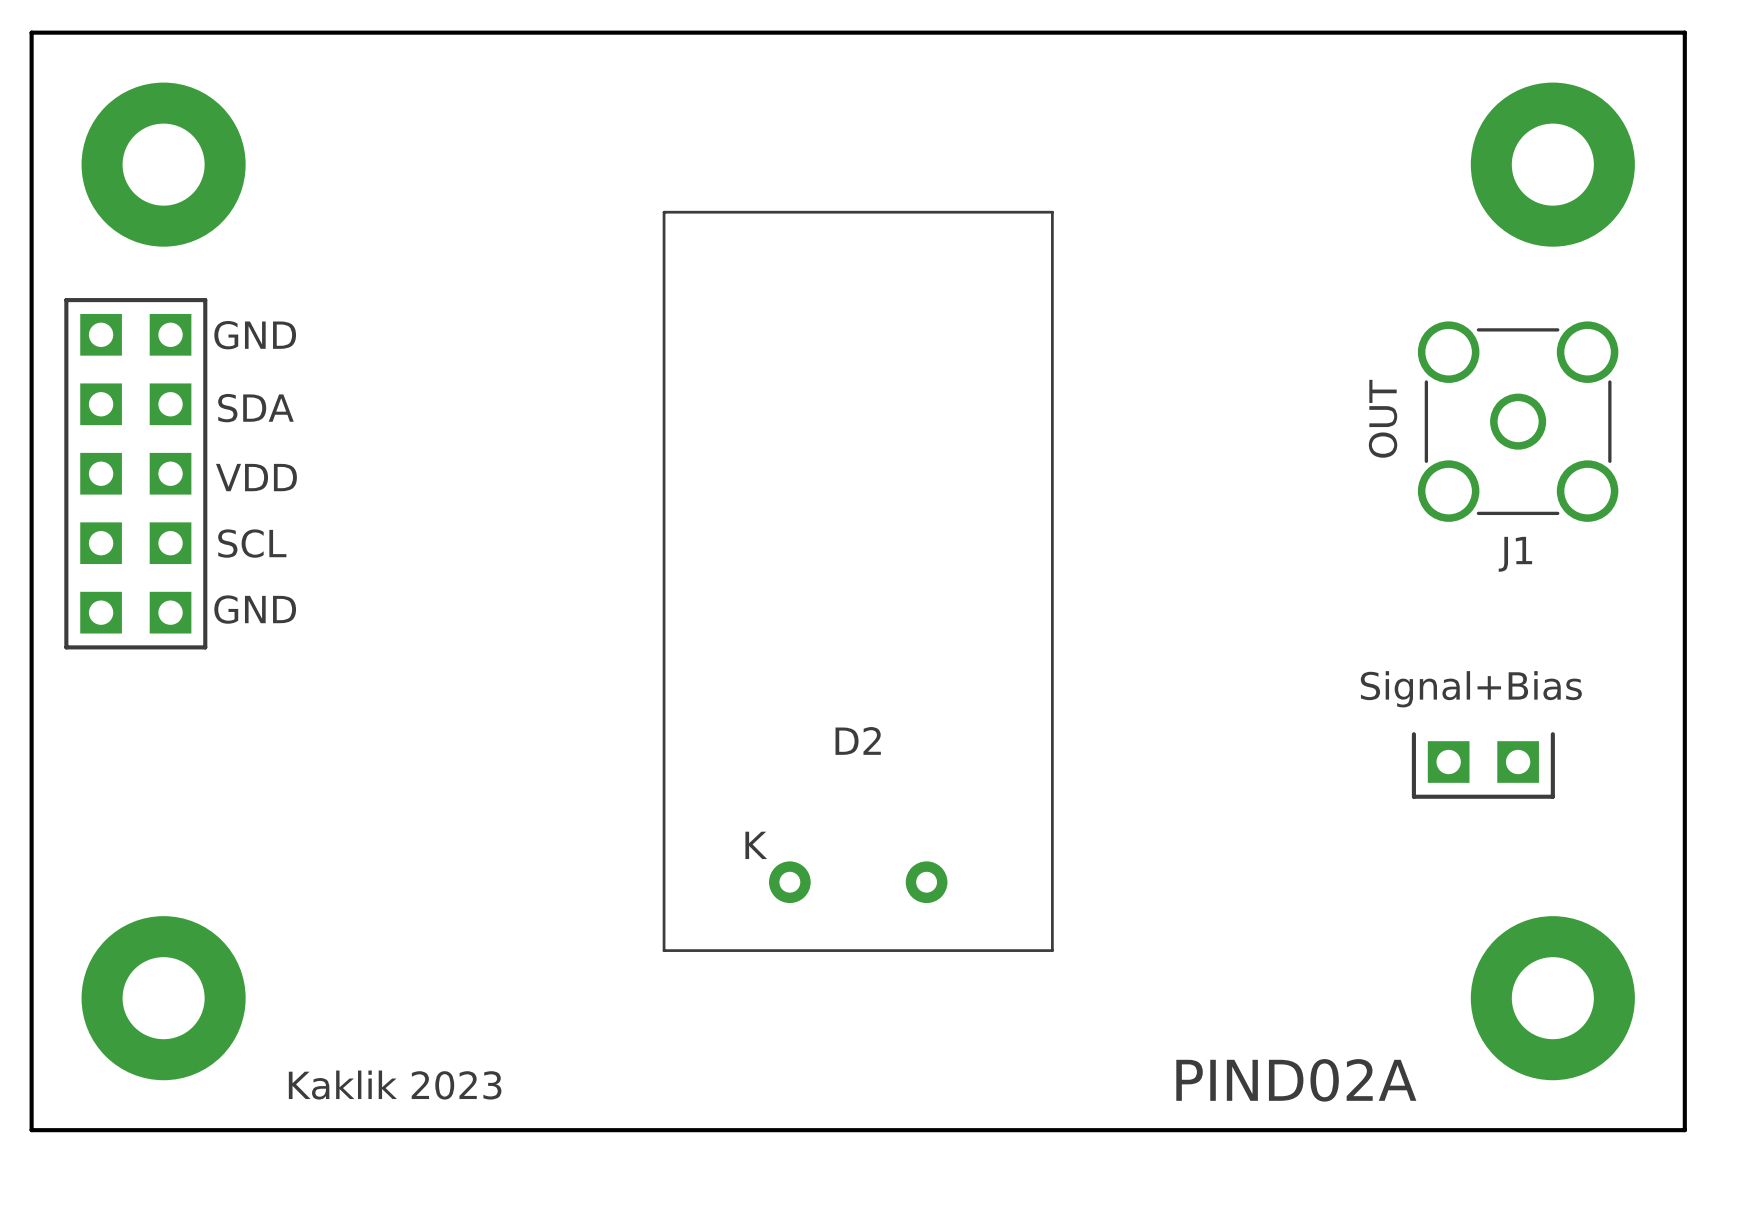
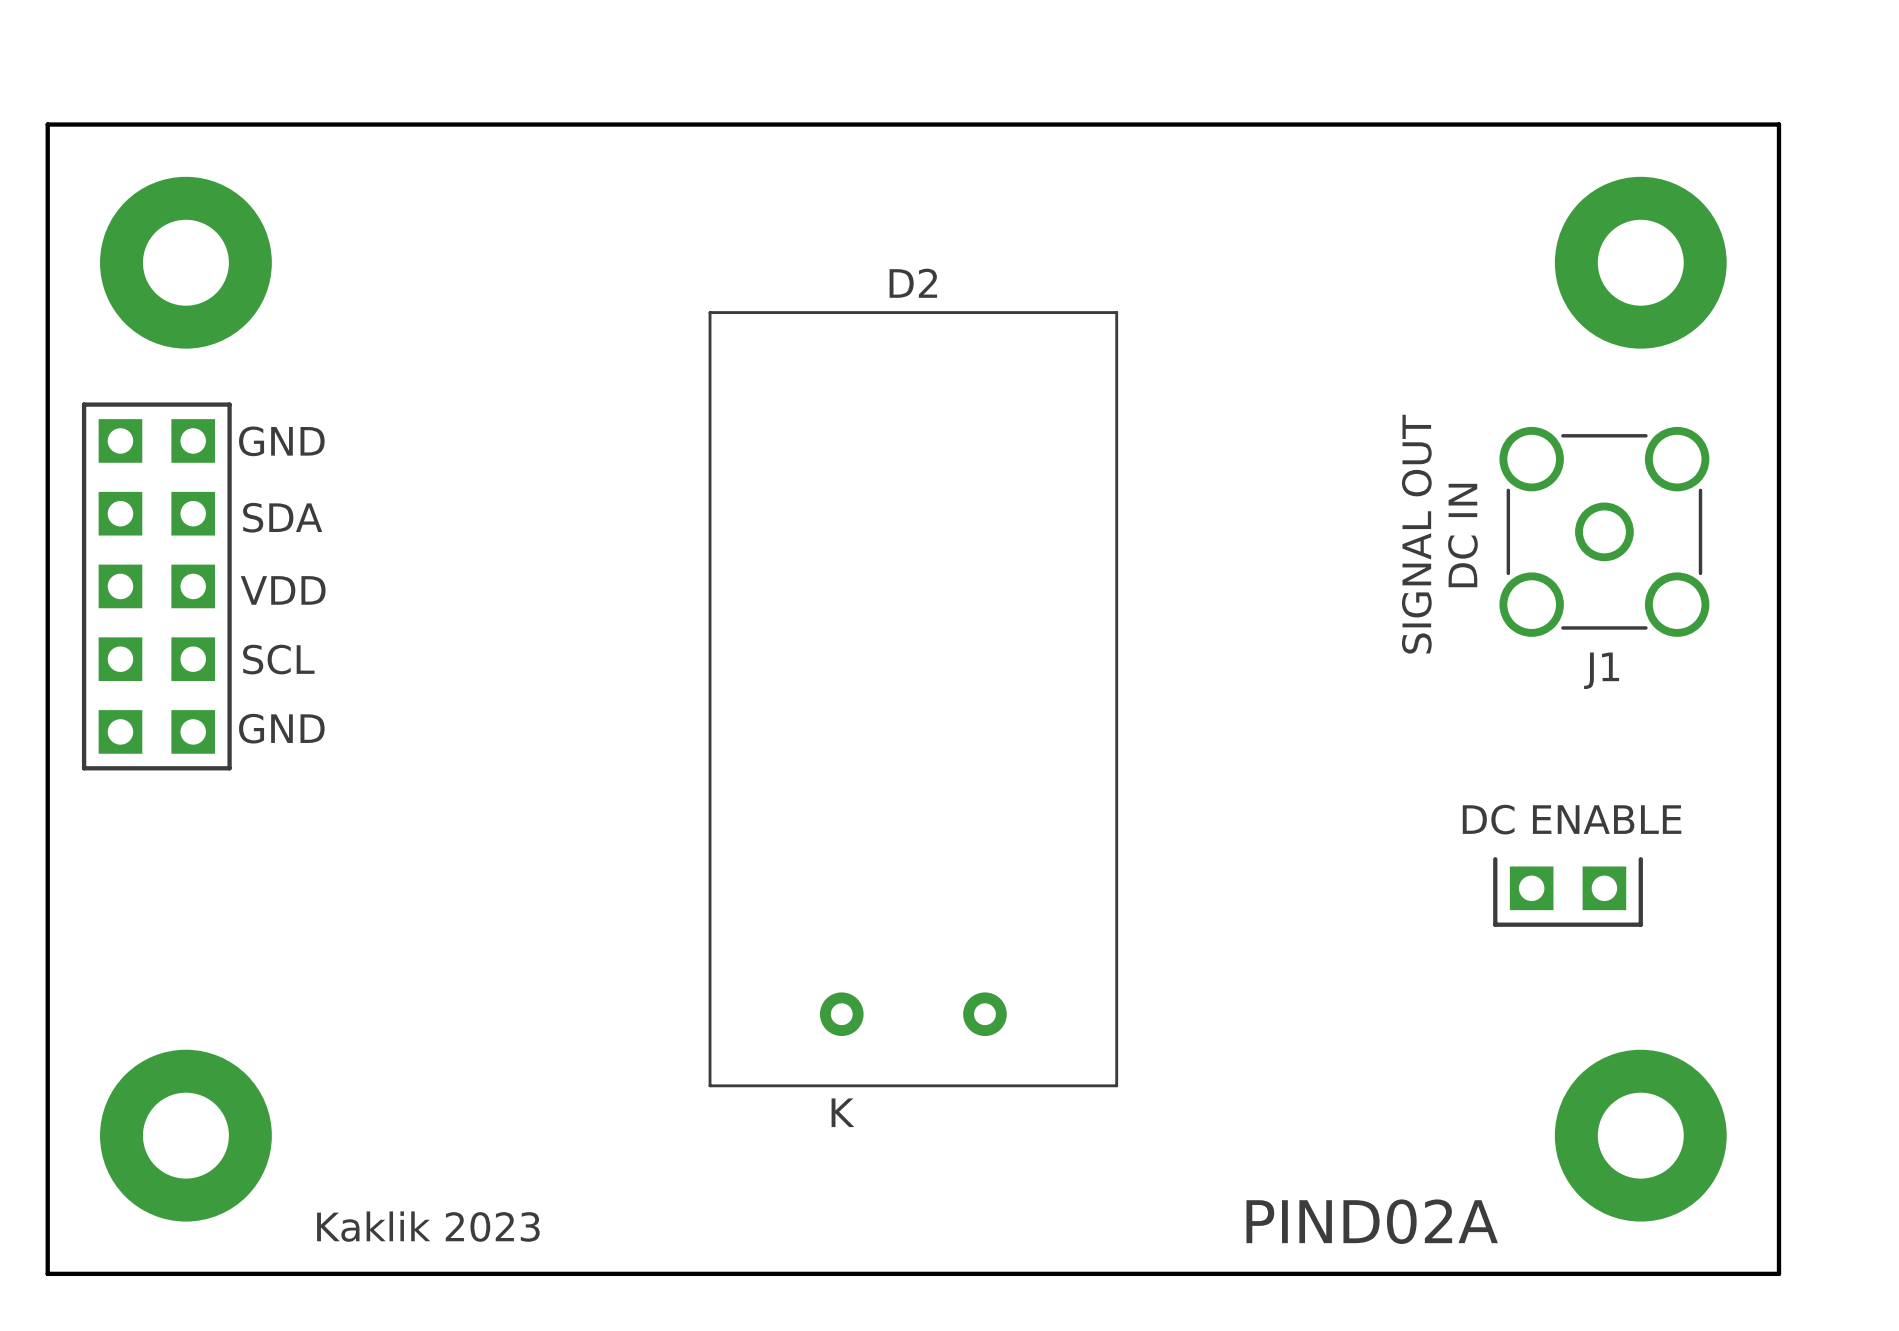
text: OUT (1383, 418) -> none
text: none -> SIGNAL OUT (1416, 534)
text: none -> DC IN (1462, 535)
text: Signal+Bias (1471, 689) -> DC ENABLE (1572, 819)
D2 name position: D2 (858, 740) -> D2 (913, 283)
D2 text position: K (756, 845) -> K (842, 1112)

